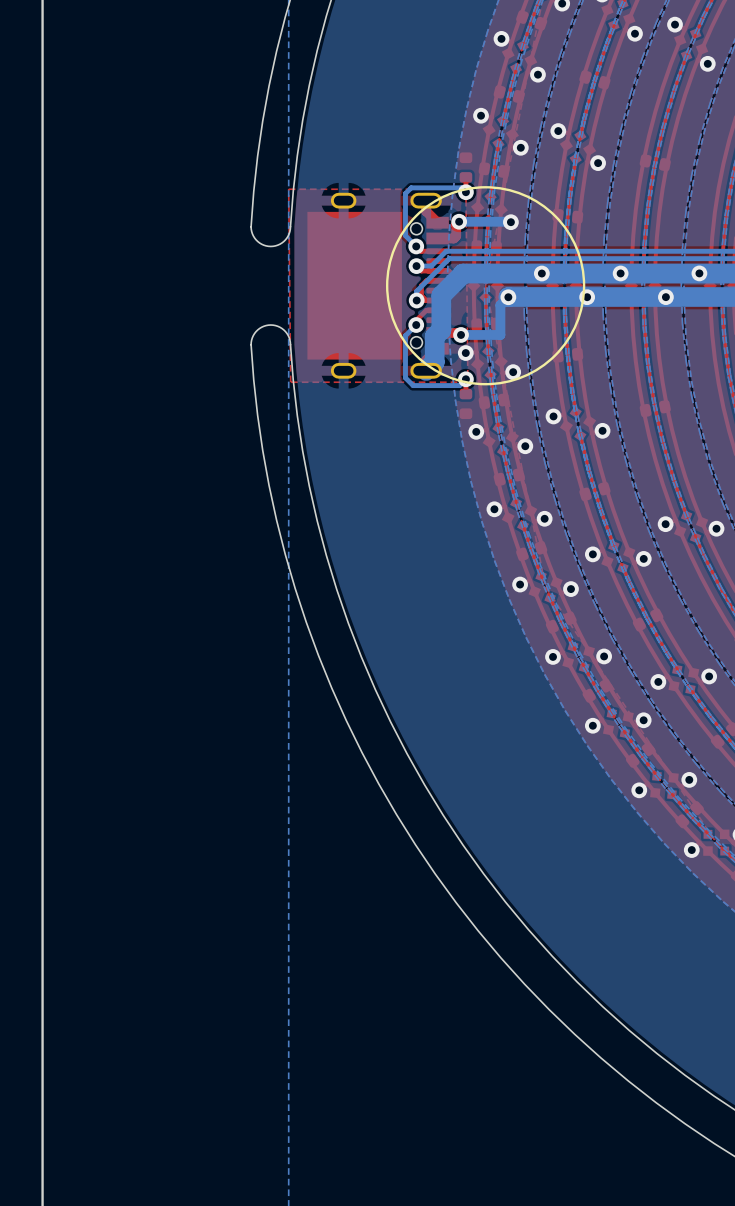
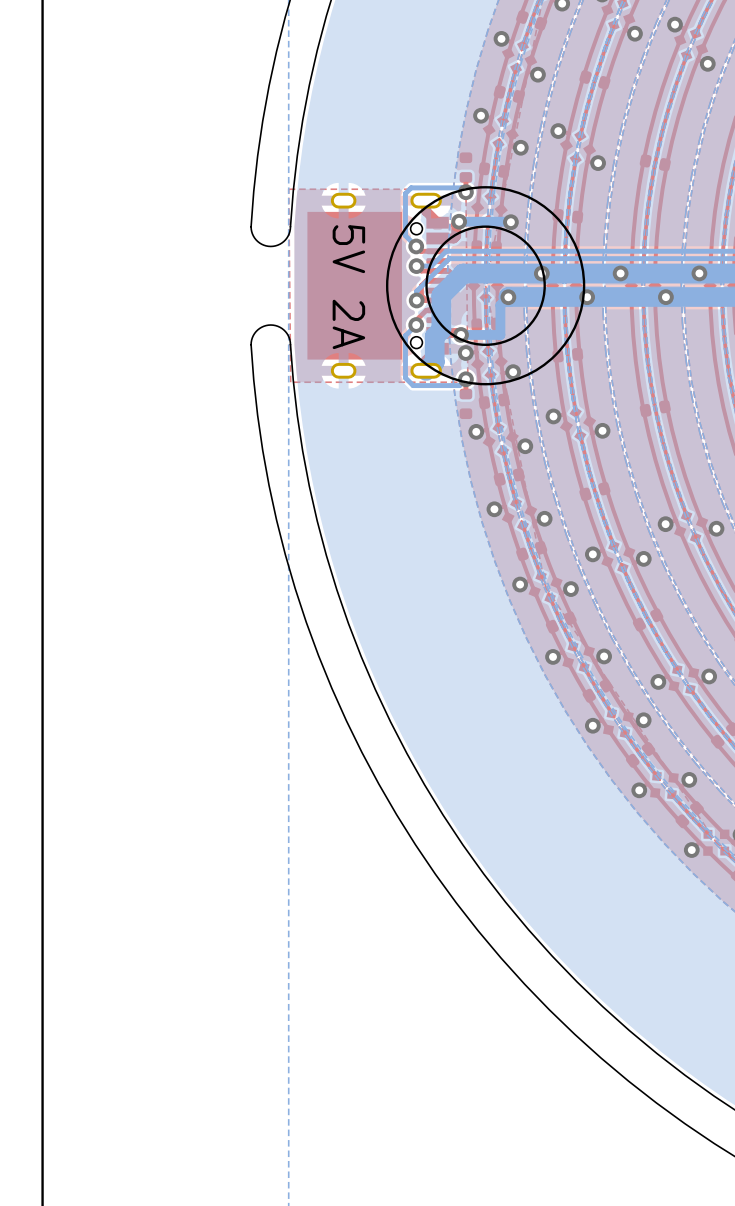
drawing: none -> [425, 225, 546, 346]
text: none -> 5V 2A (348, 287)

